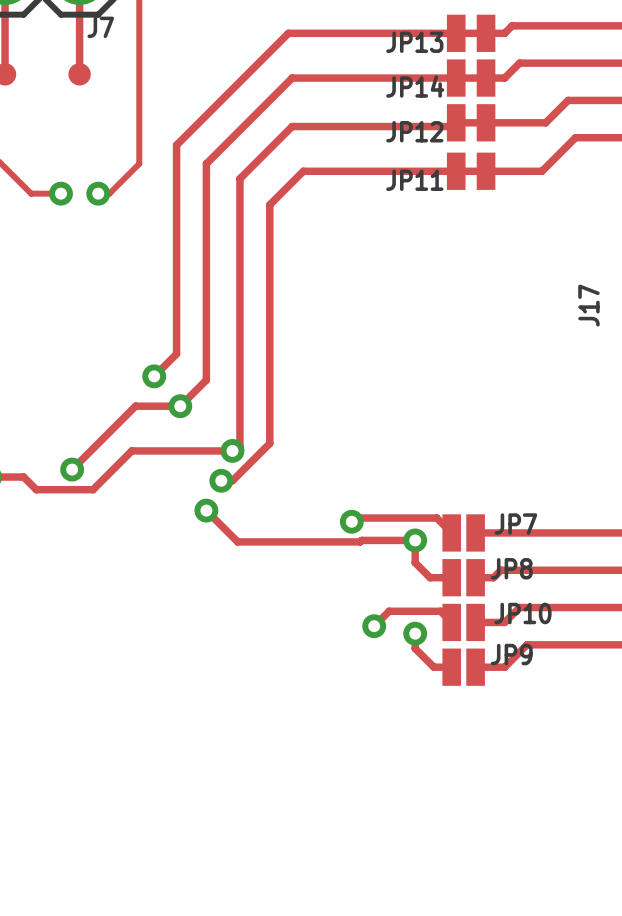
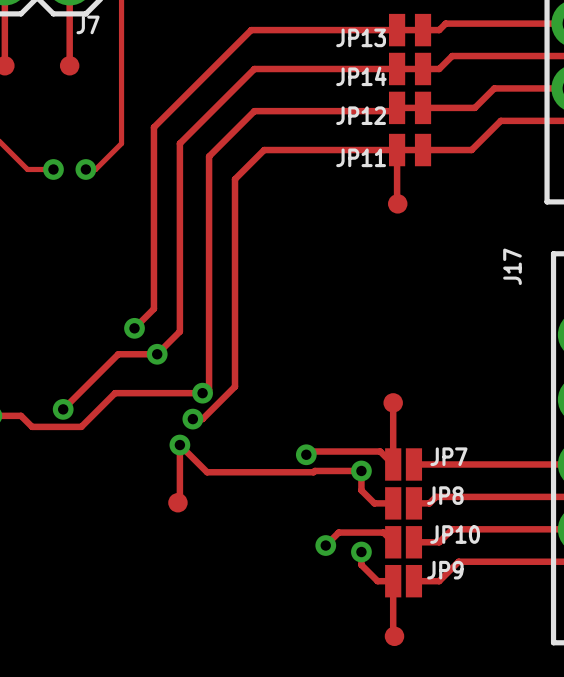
track: none -> (397, 150) (397, 203)
part: none -> (397, 203)
track: none -> (393, 402) (393, 464)
part: none -> (393, 402)
track: none -> (179, 445) (179, 500) (177, 502)
part: none -> (177, 502)
track: none -> (393, 581) (394, 636)
part: none -> (394, 636)

